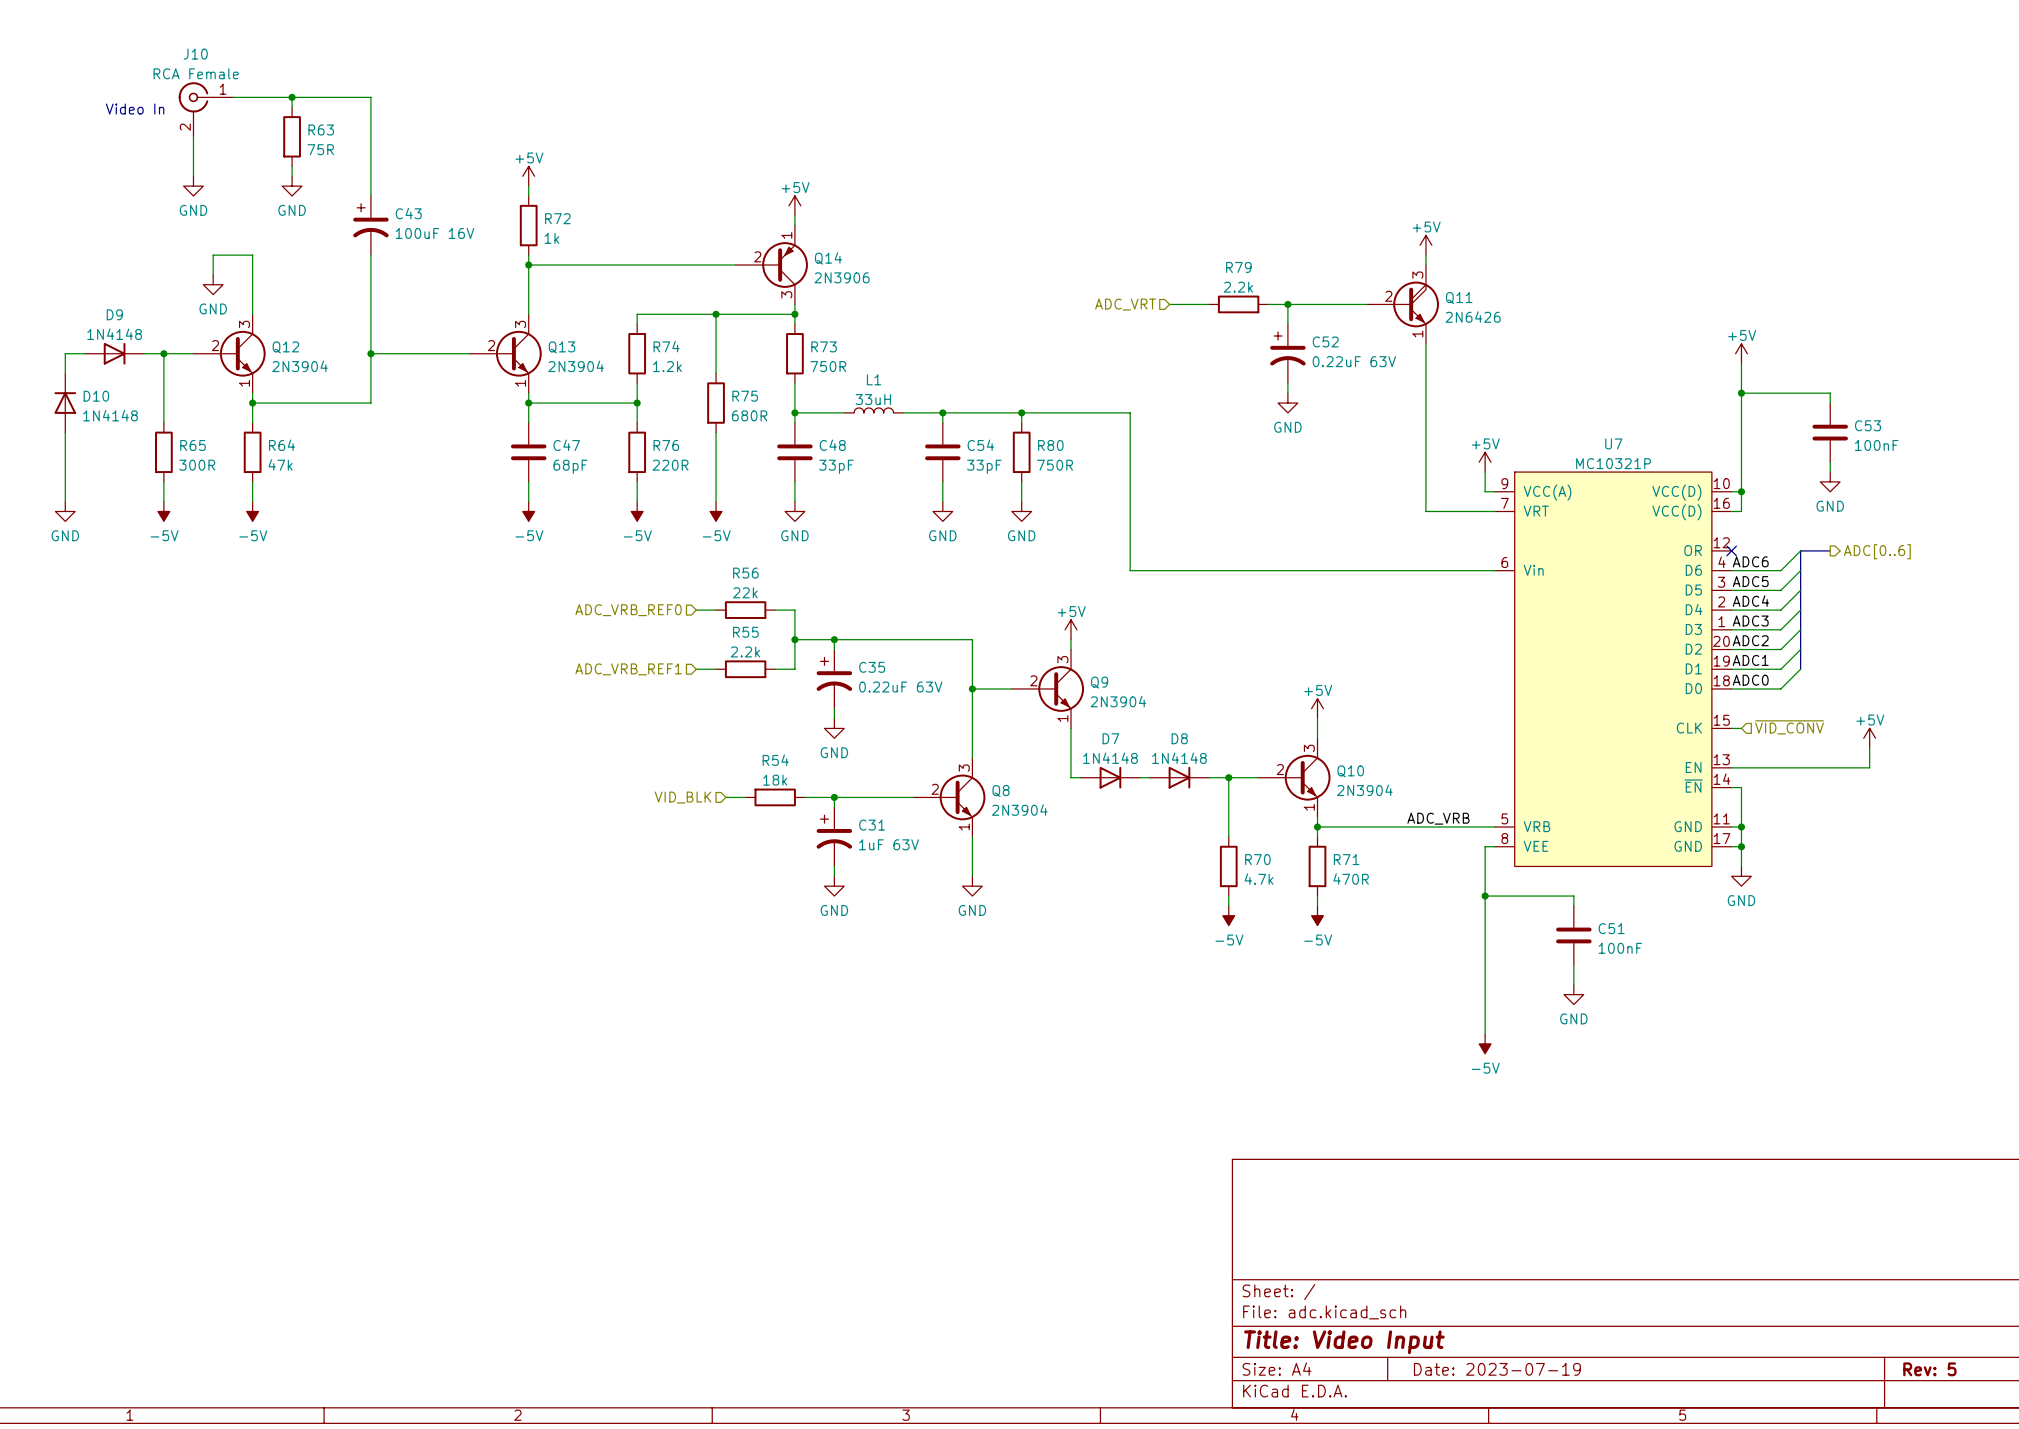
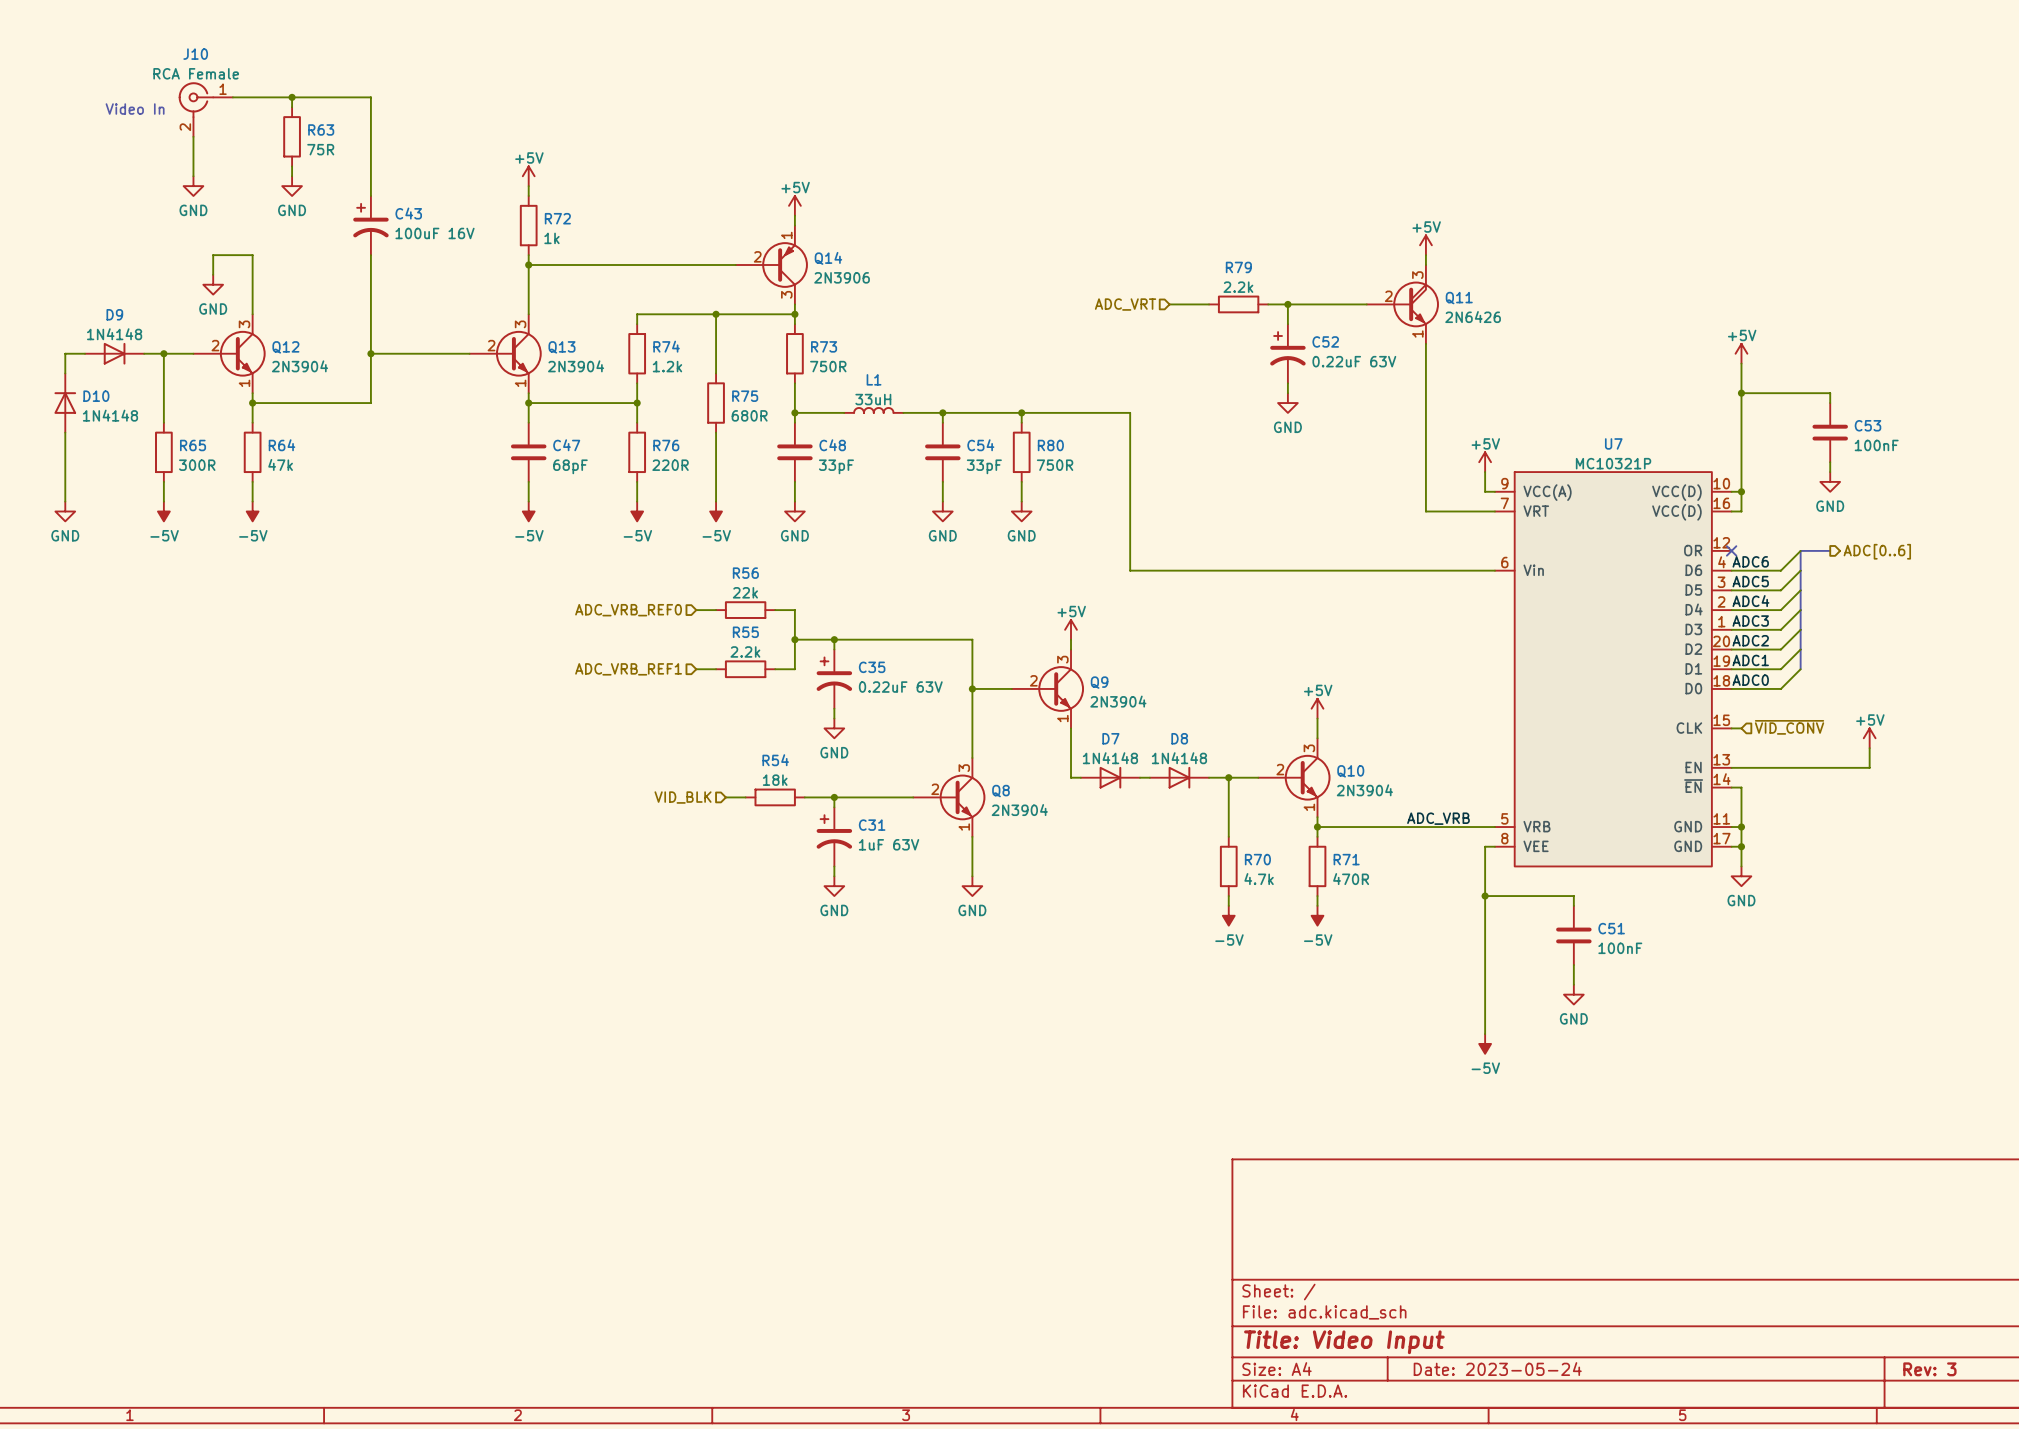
title block: Date: 2023-07-19 (1497, 1369) -> Date: 2023-05-24 (1497, 1369)
title block: Rev: 5 (1929, 1369) -> Rev: 3 (1929, 1369)

